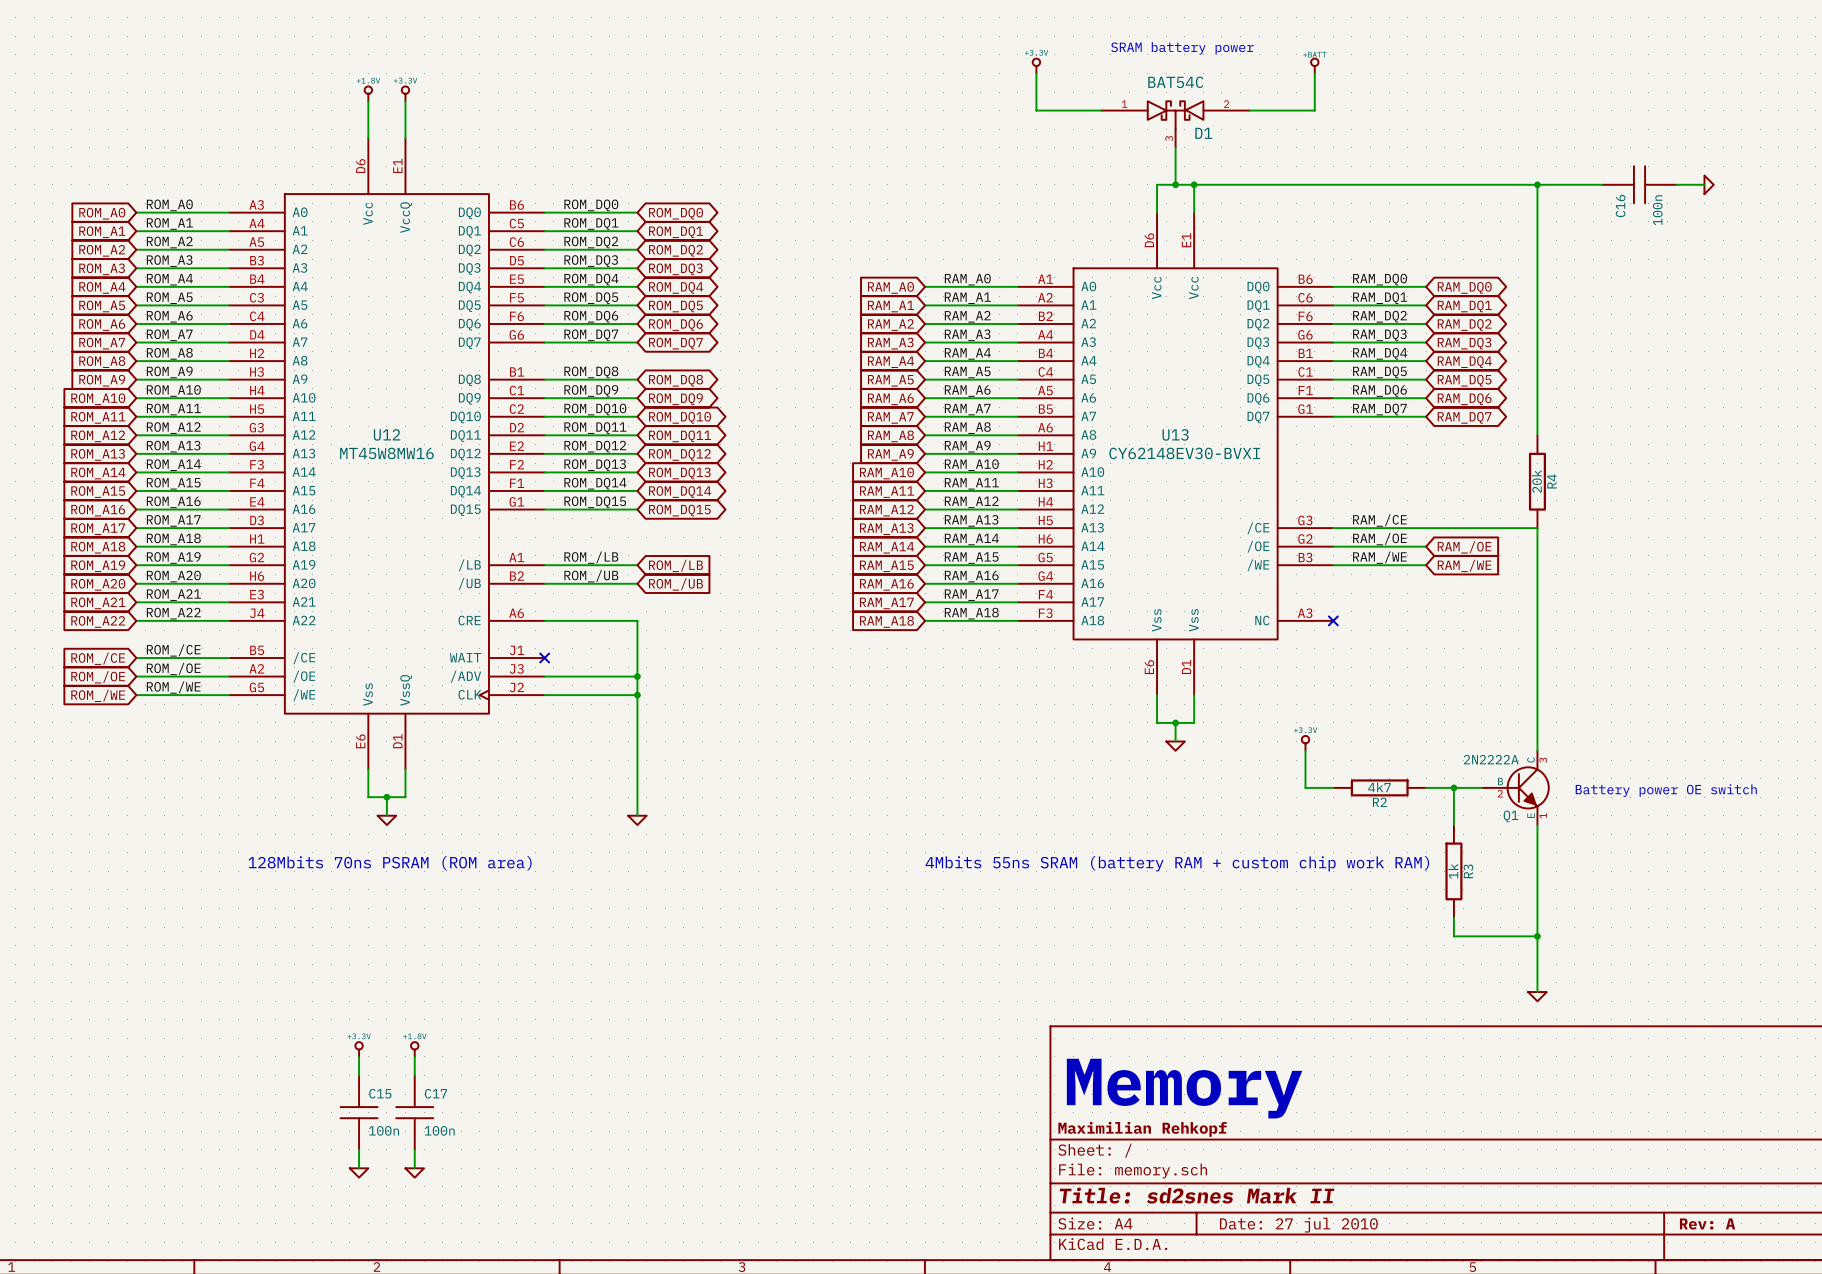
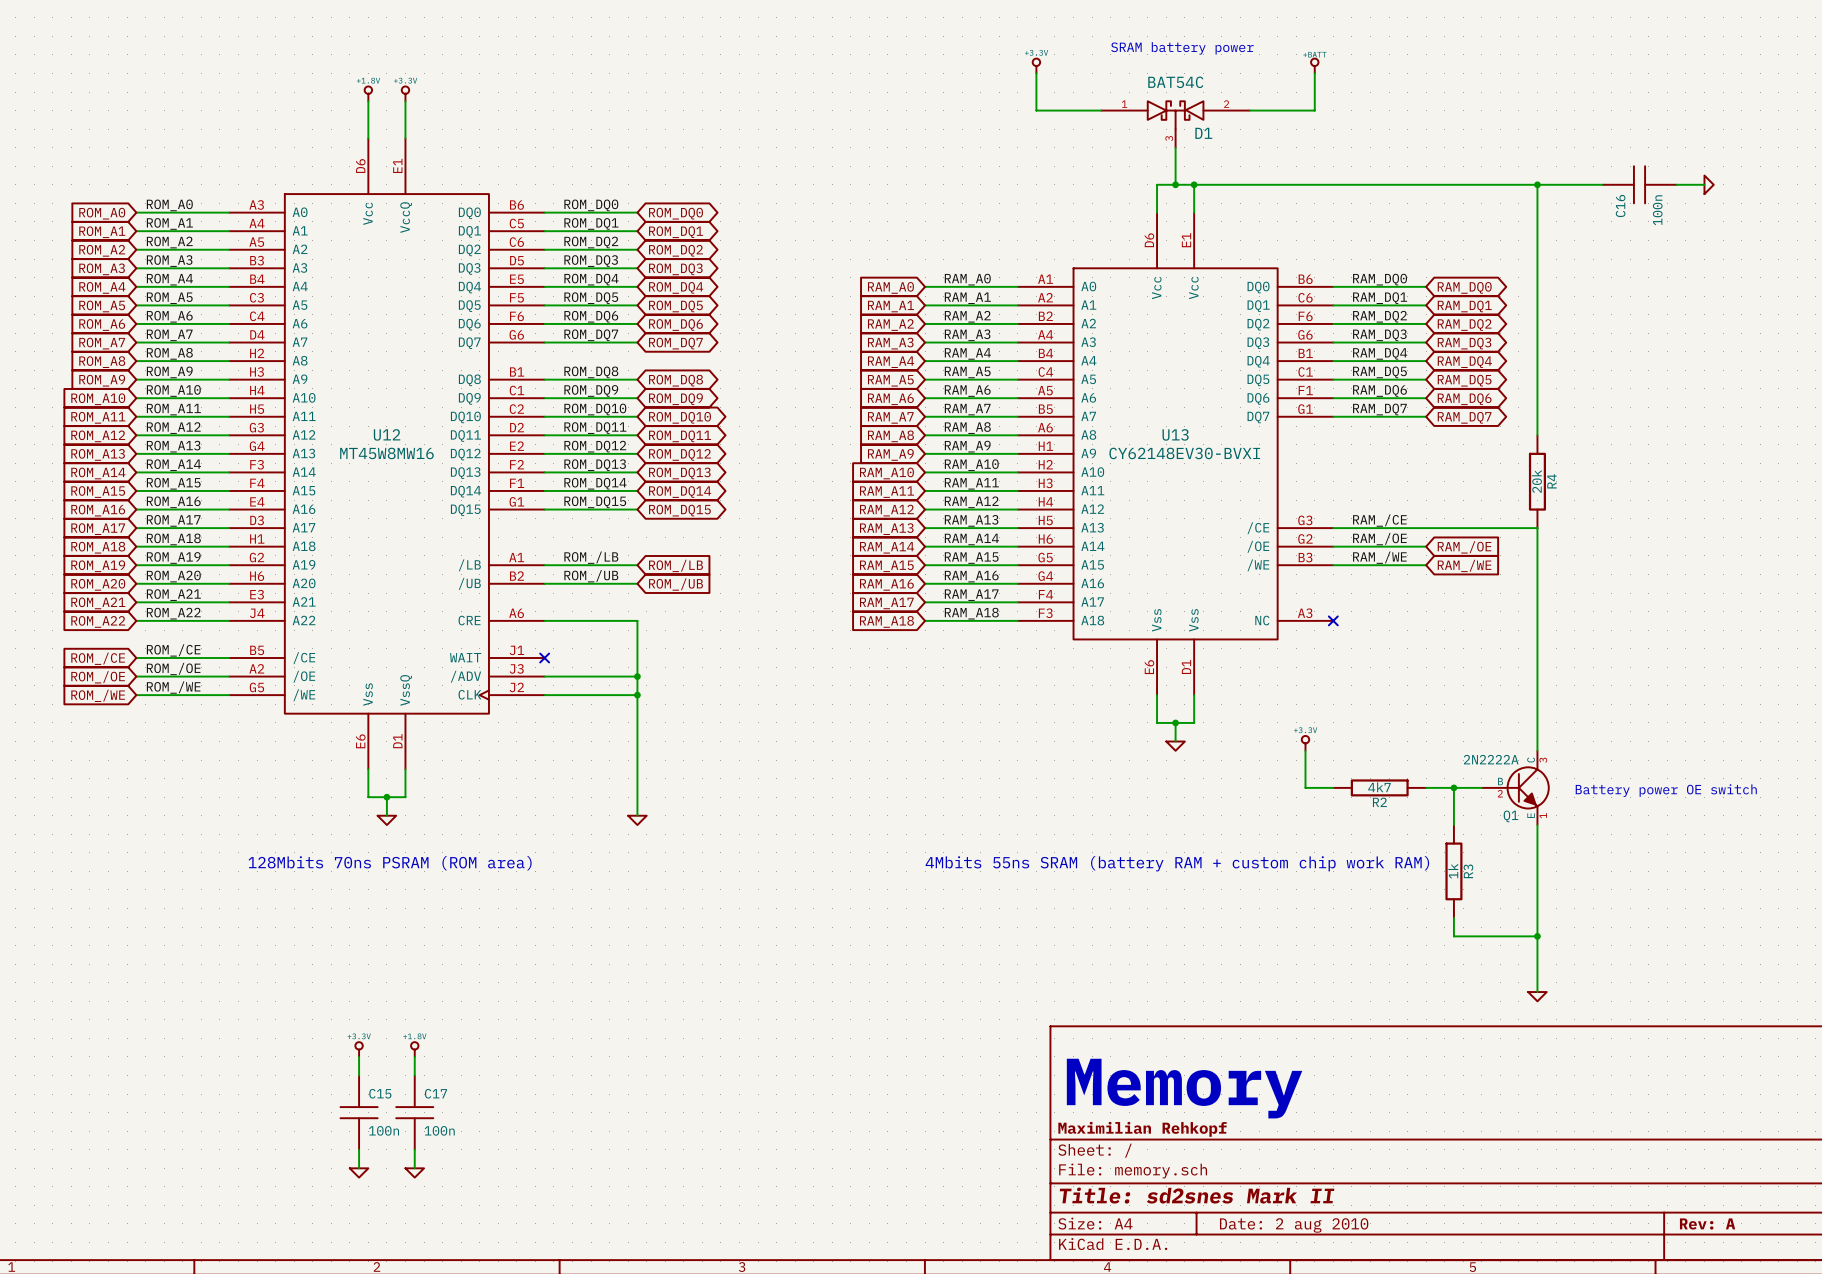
title block: Date: 27 jul 2010 (1298, 1225) -> Date: 2 aug 2010 (1294, 1225)

